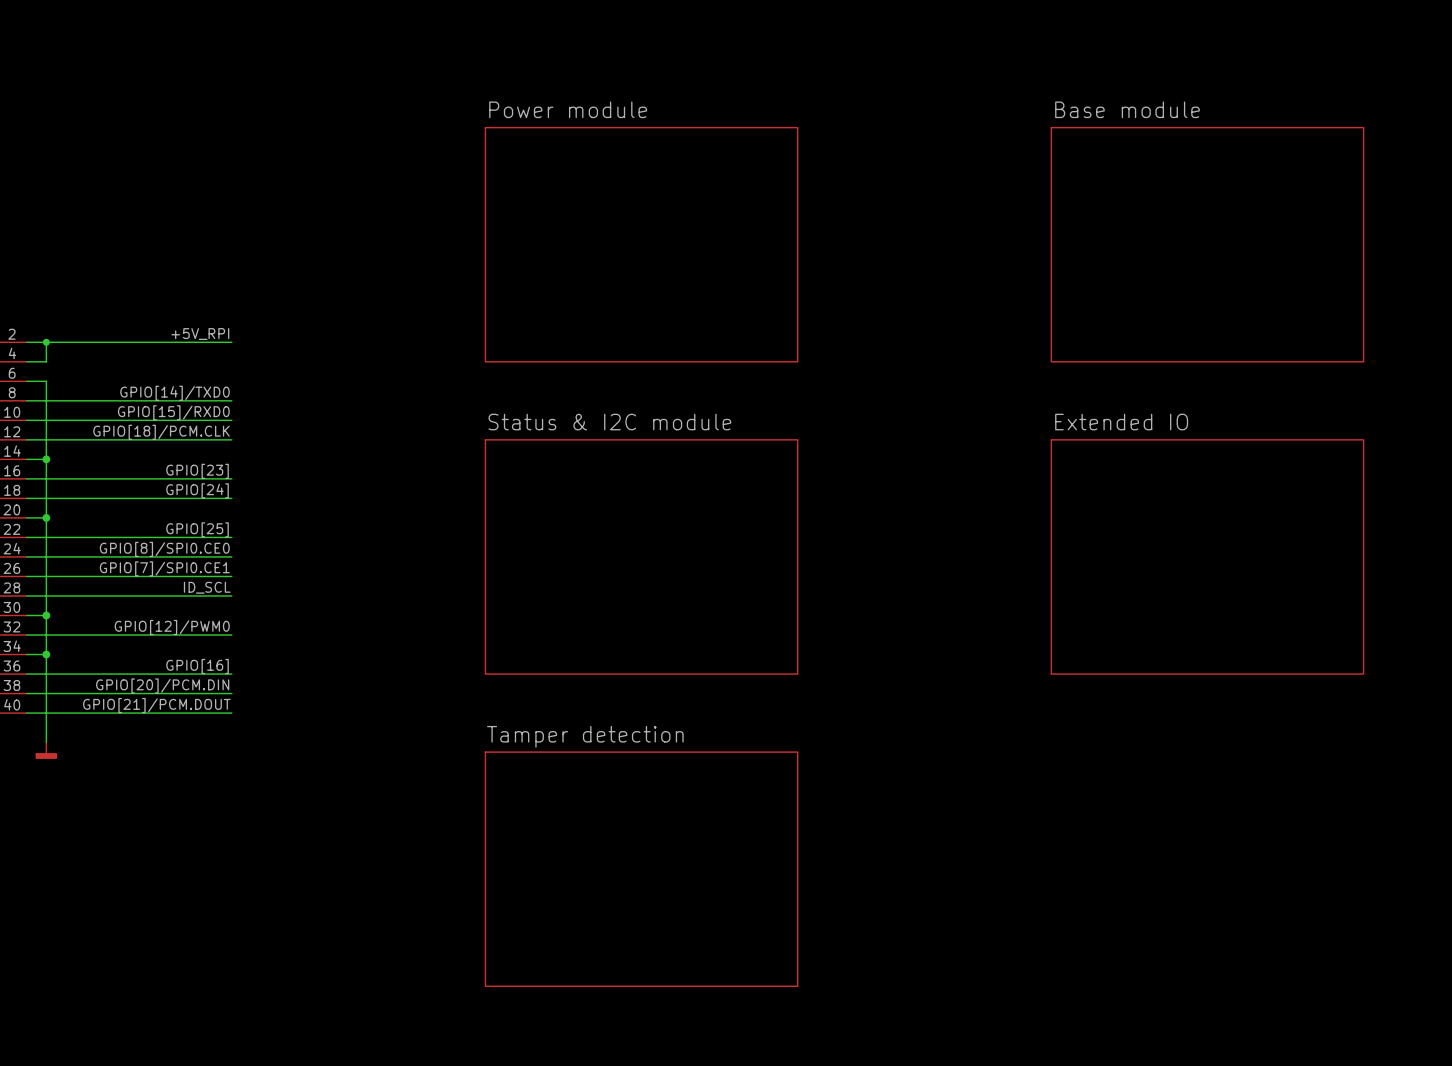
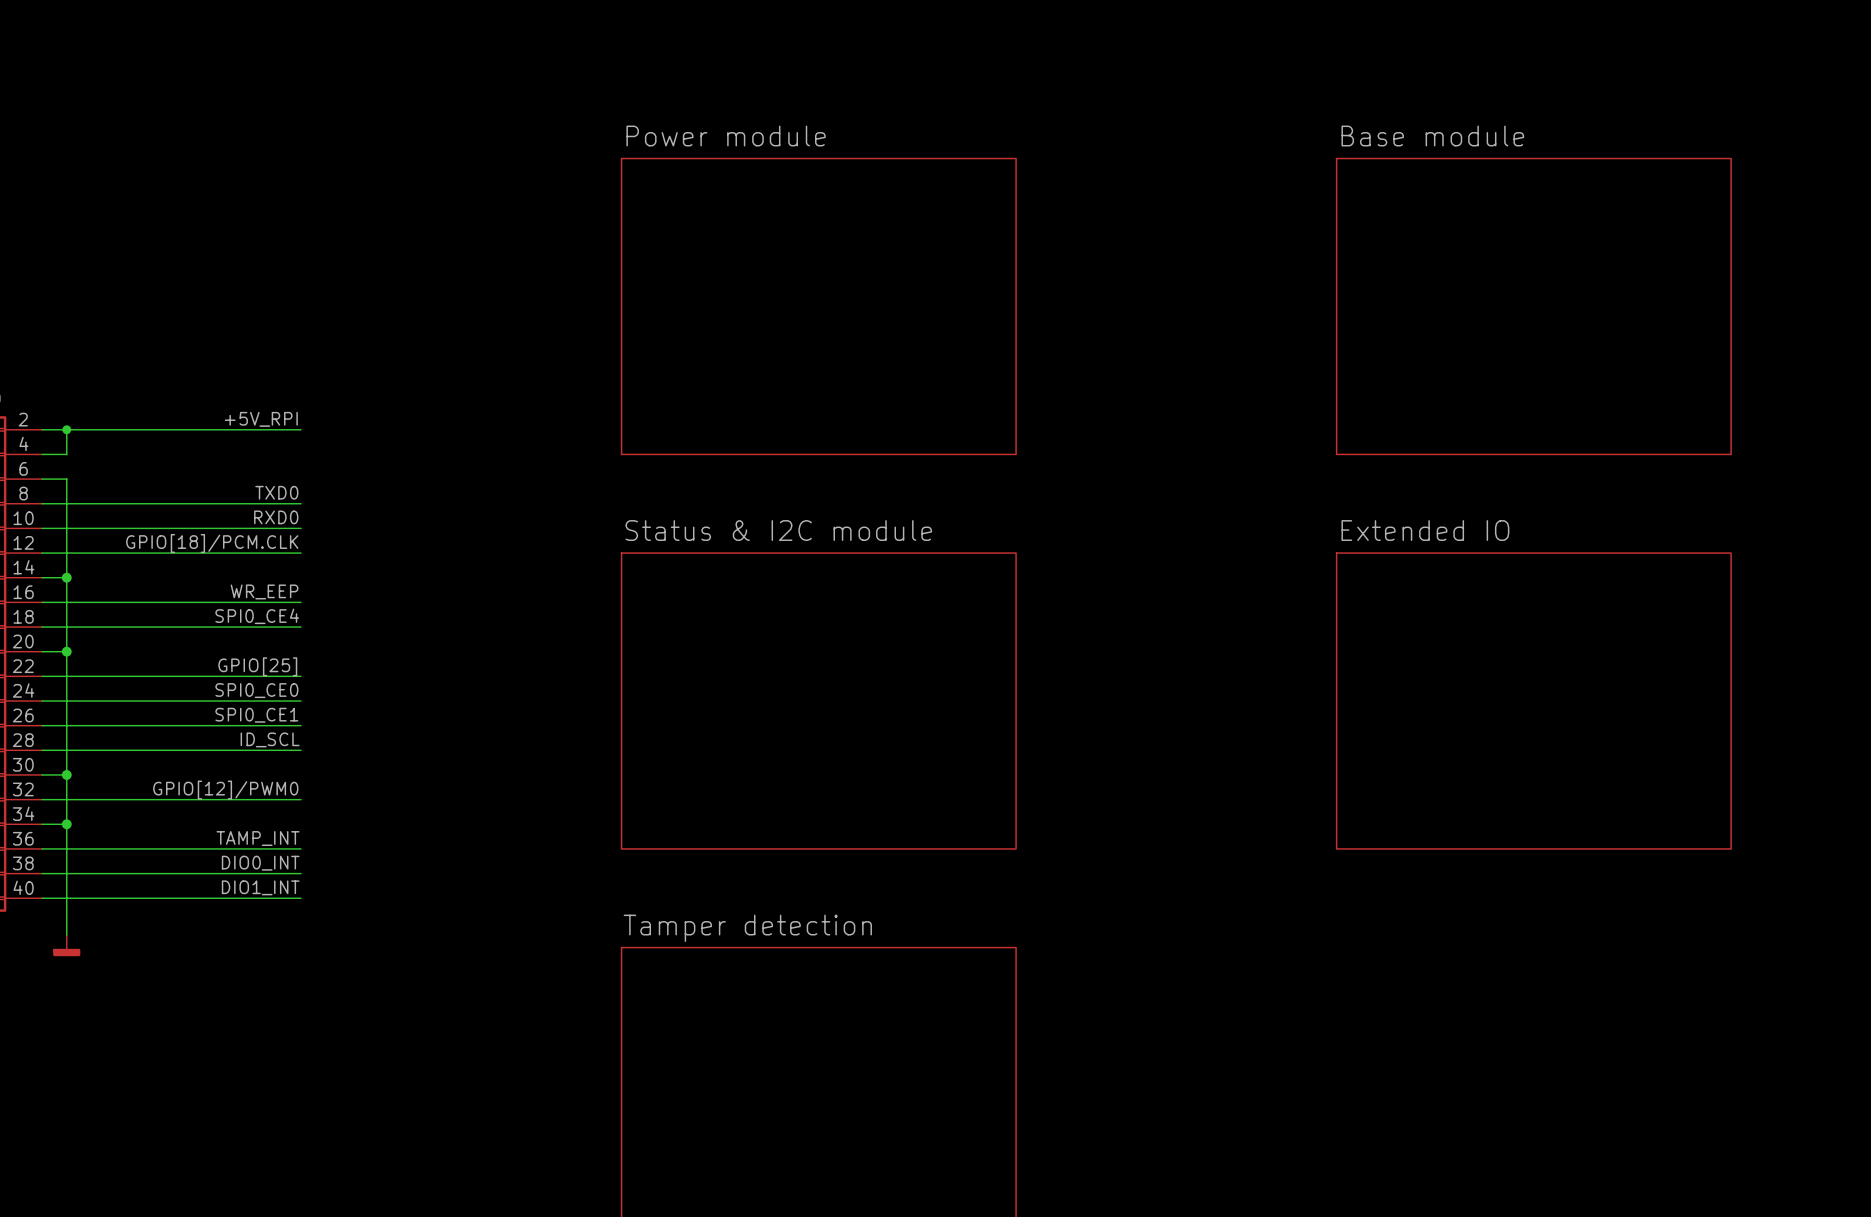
label: GPIO[14]/TXD0 (174, 393) -> TXD0 (276, 492)
label: GPIO[15]/RXD0 (173, 412) -> RXD0 (276, 517)
label: GPIO[23] (197, 471) -> WR_EEP (264, 591)
label: GPIO[24] (197, 490) -> SPI0_CE4 (257, 616)
label: GPIO[8]/SPI0.CE0 (164, 549) -> SPI0_CE0 (256, 690)
label: GPIO[7]/SPI0.CE1 (164, 568) -> SPI0_CE1 (256, 715)
label: GPIO[16] (197, 666) -> TAMP_INT (258, 838)
label: GPIO[20]/PCM.DIN (162, 686) -> DIO0_INT (260, 863)
label: GPIO[21]/PCM.DOUT (156, 705) -> DIO1_INT (260, 887)

